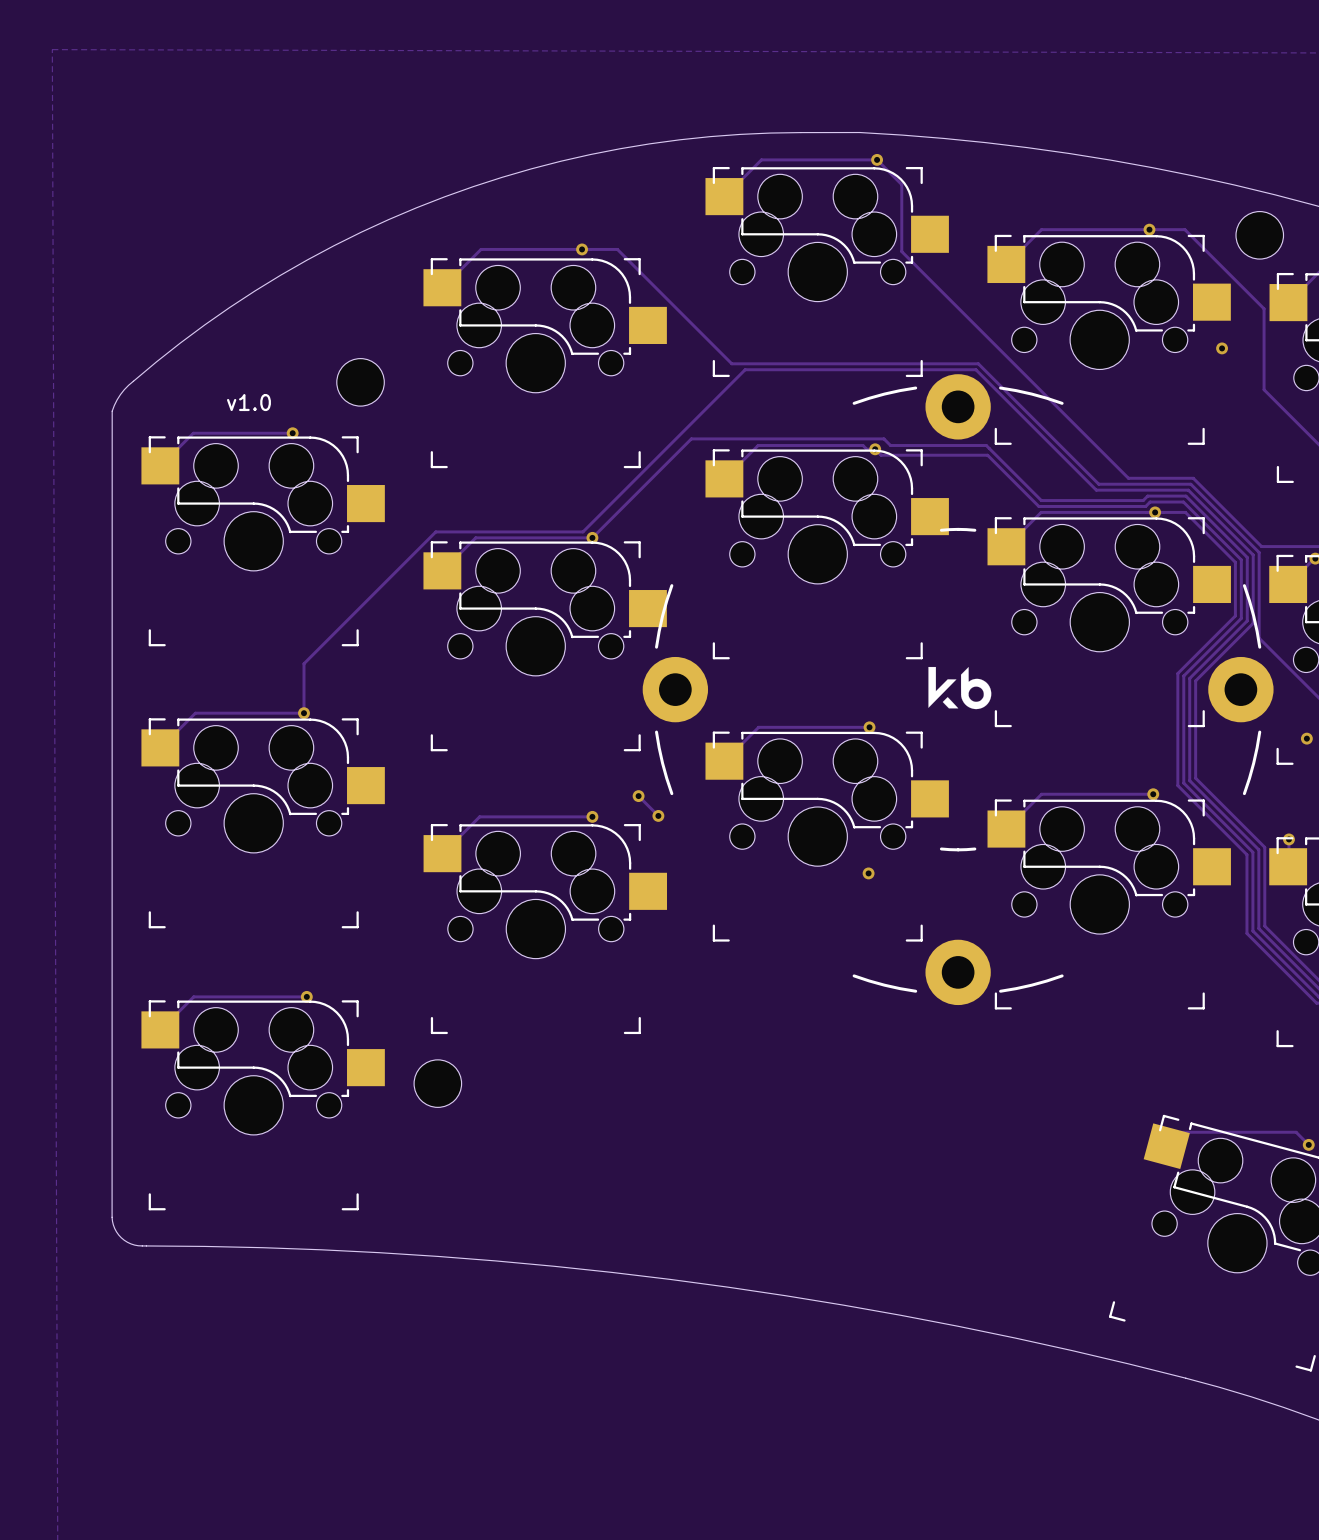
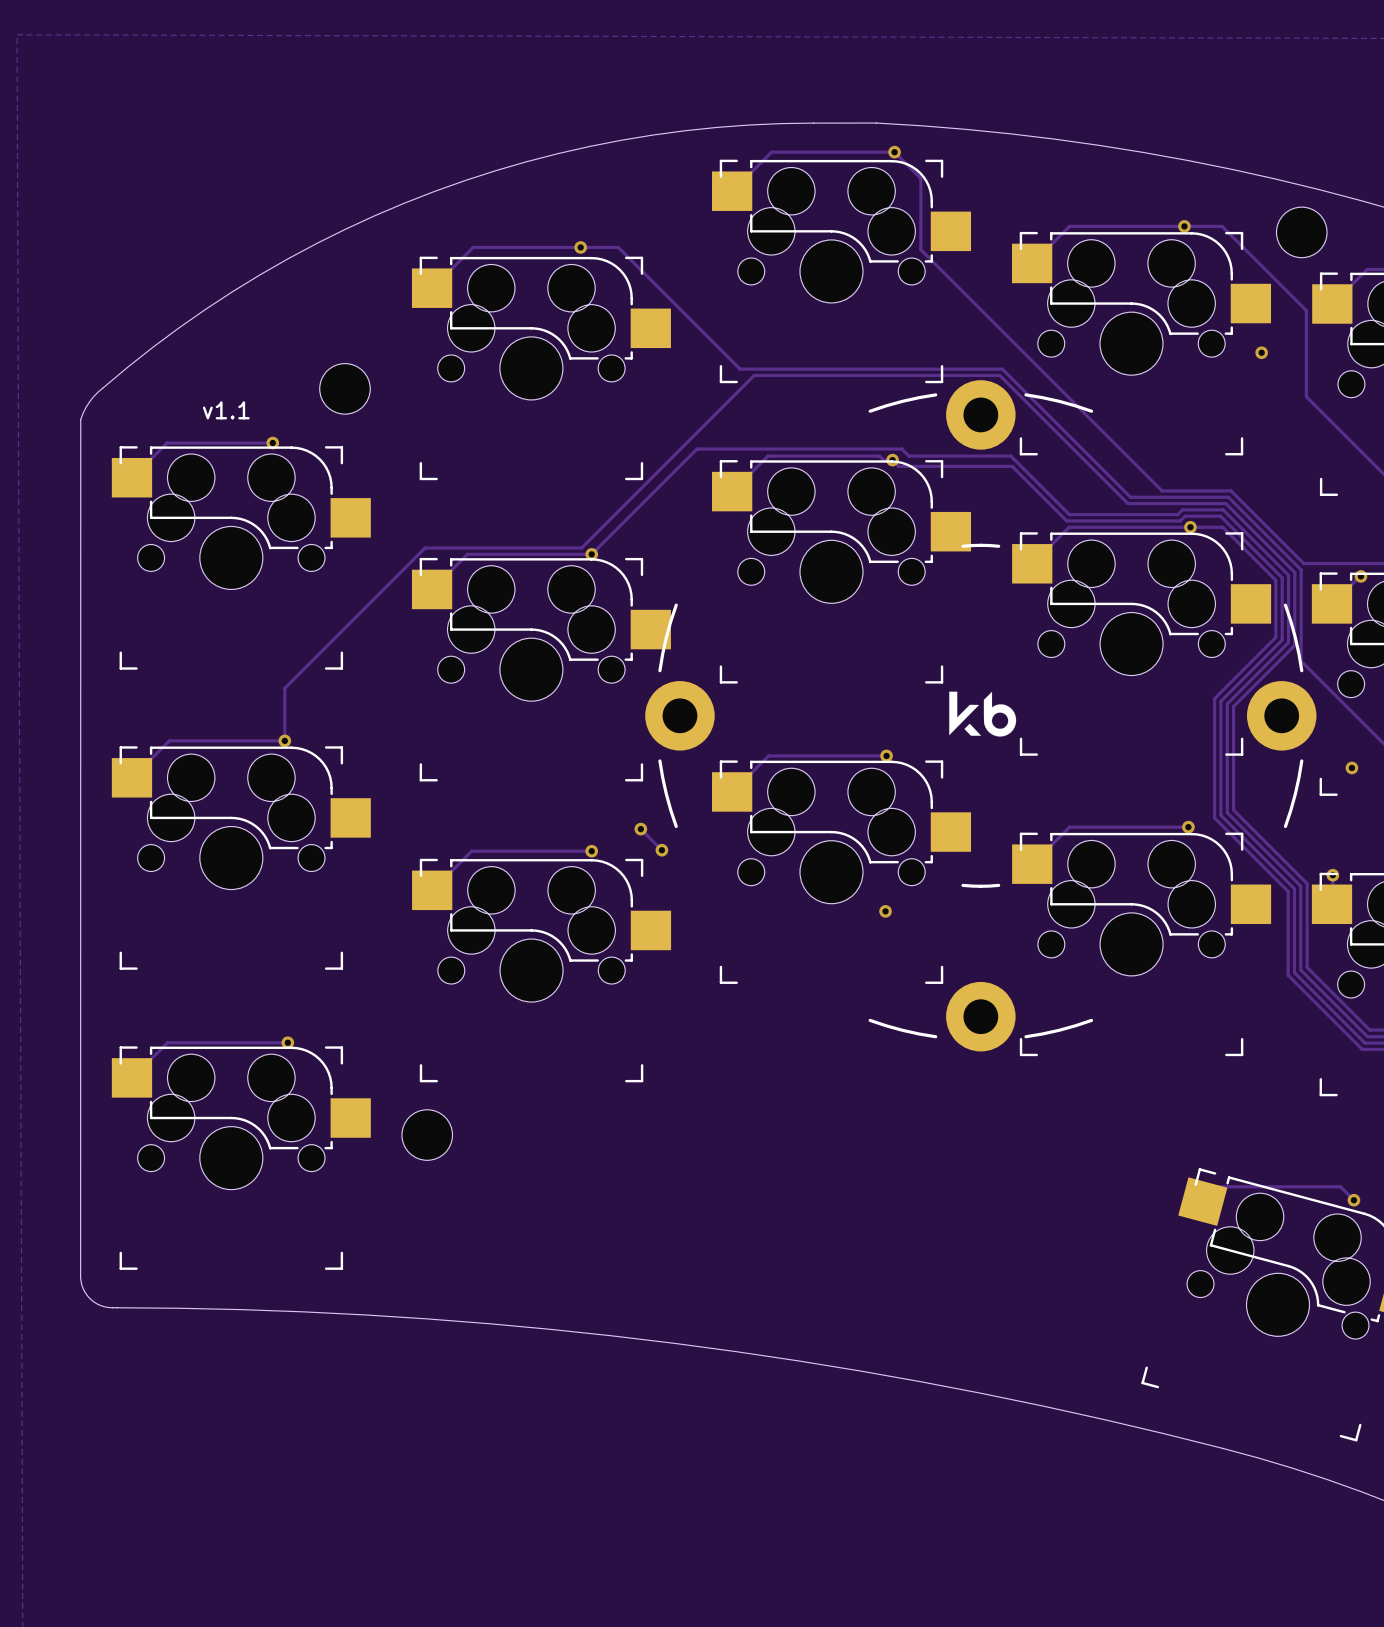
text: v1.0 (248, 402) -> v1.1 (226, 410)

